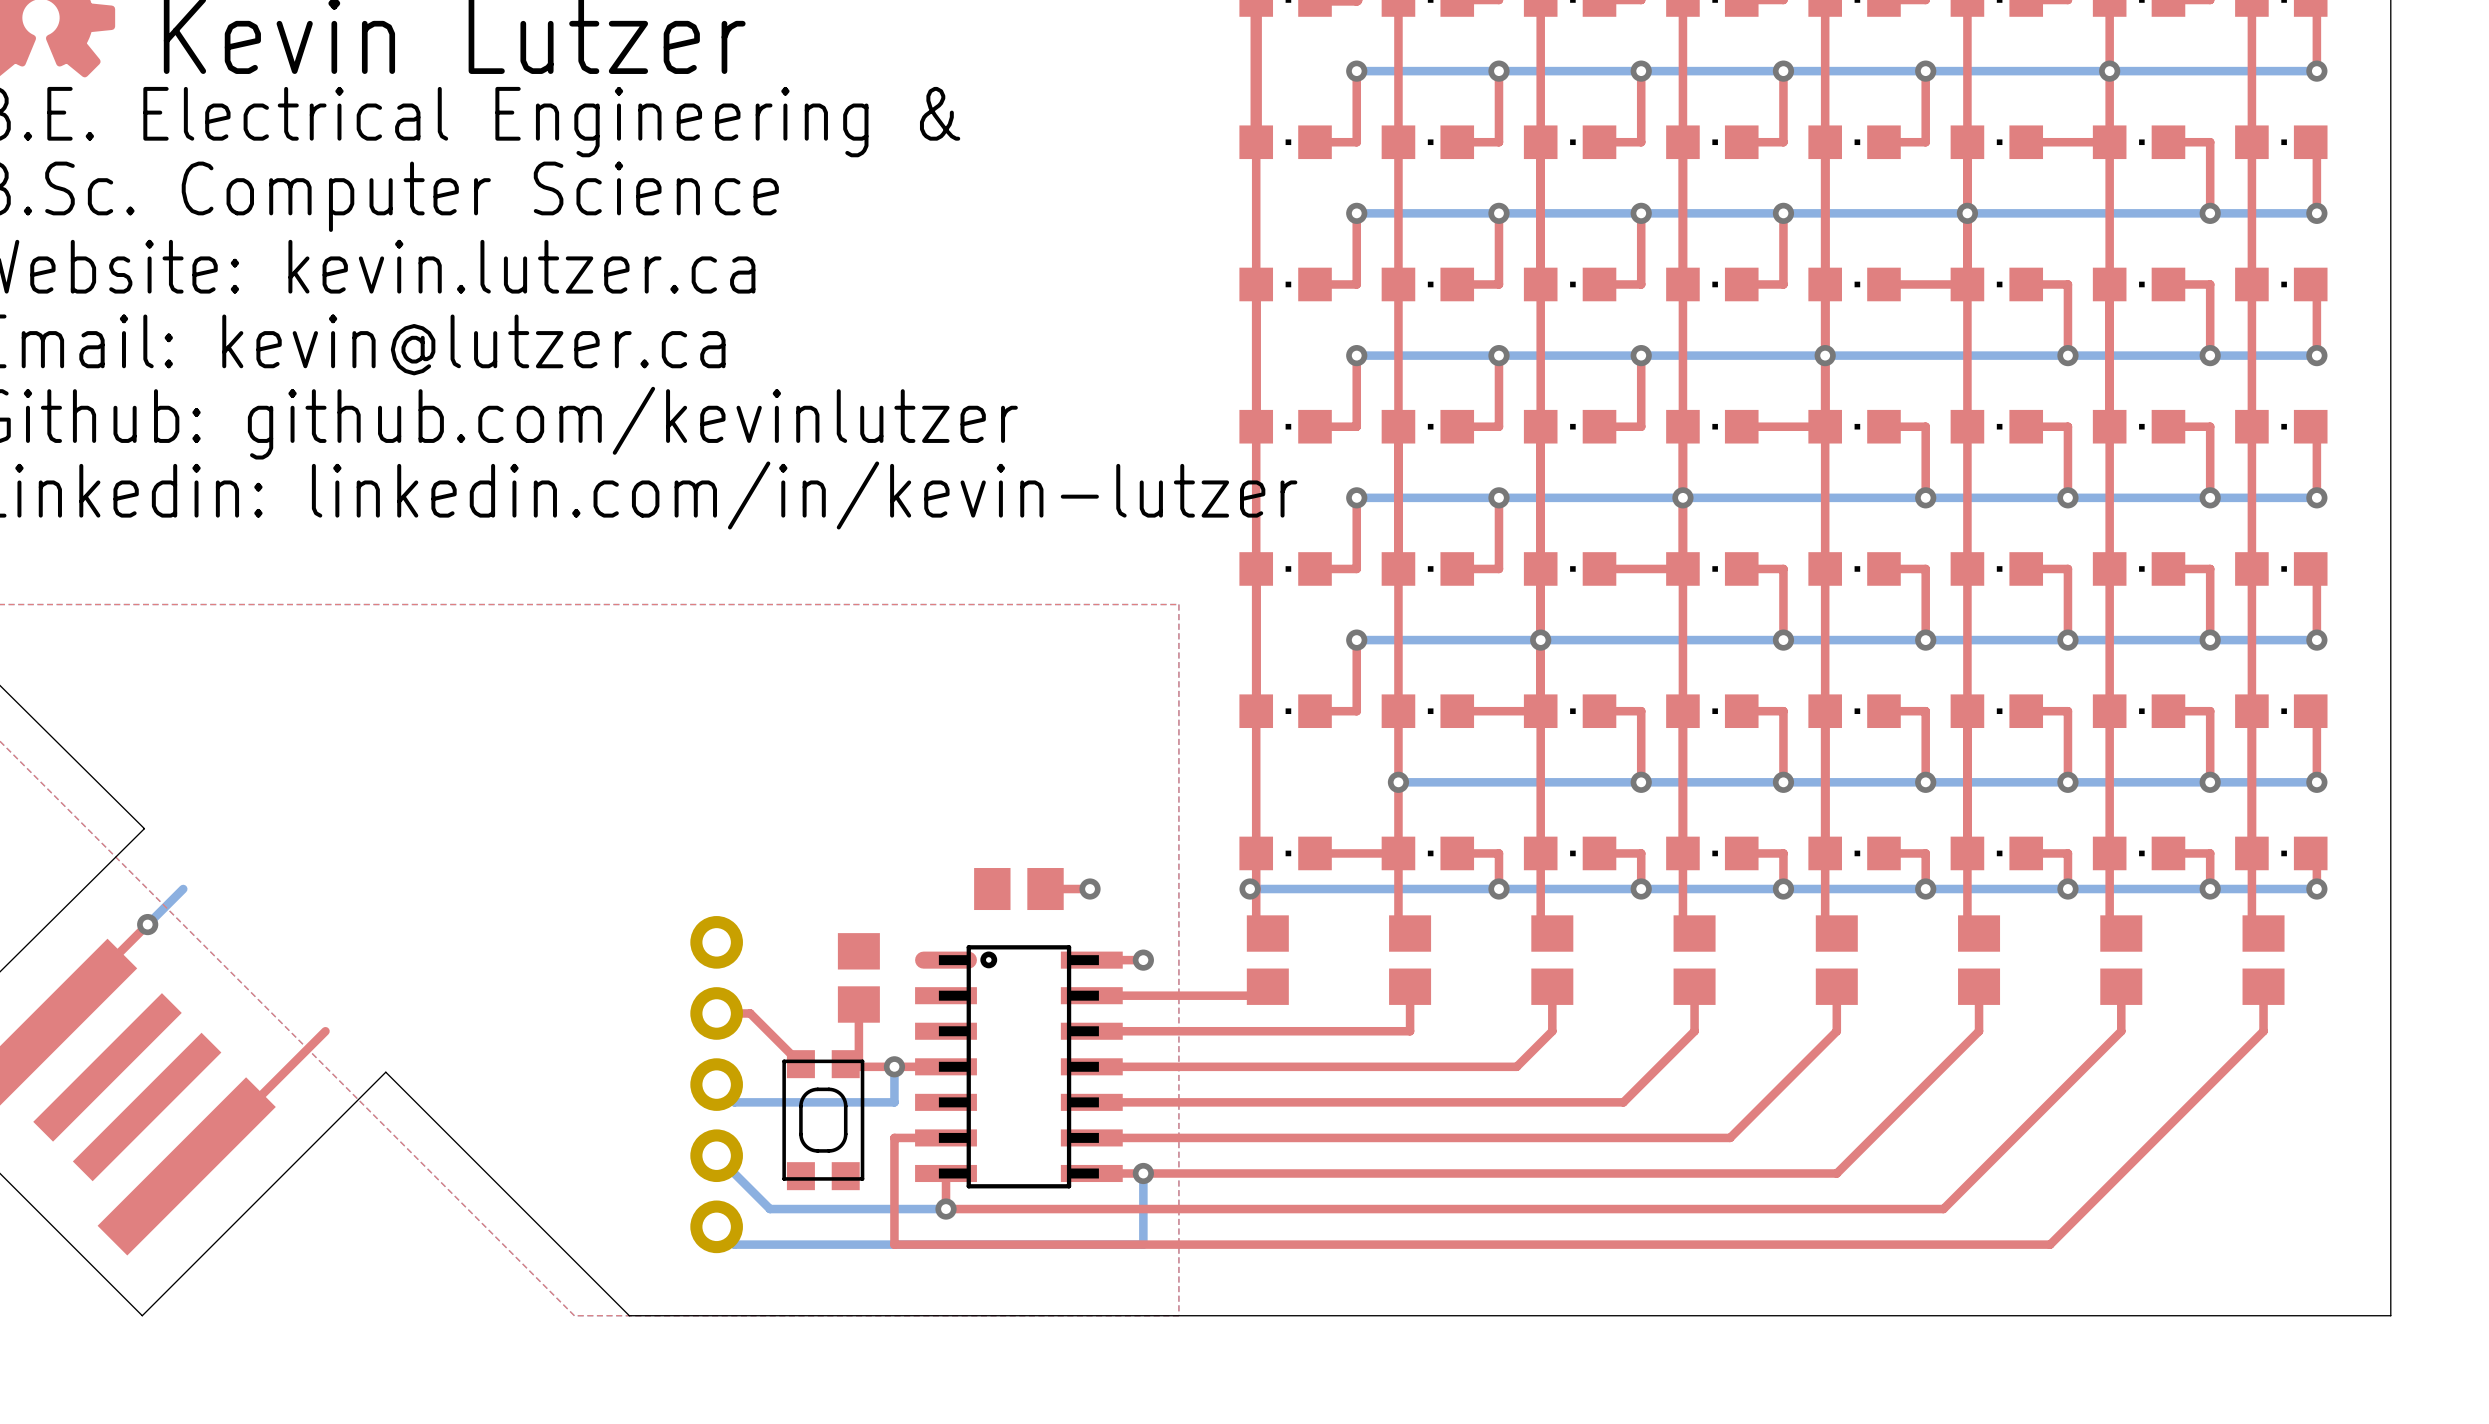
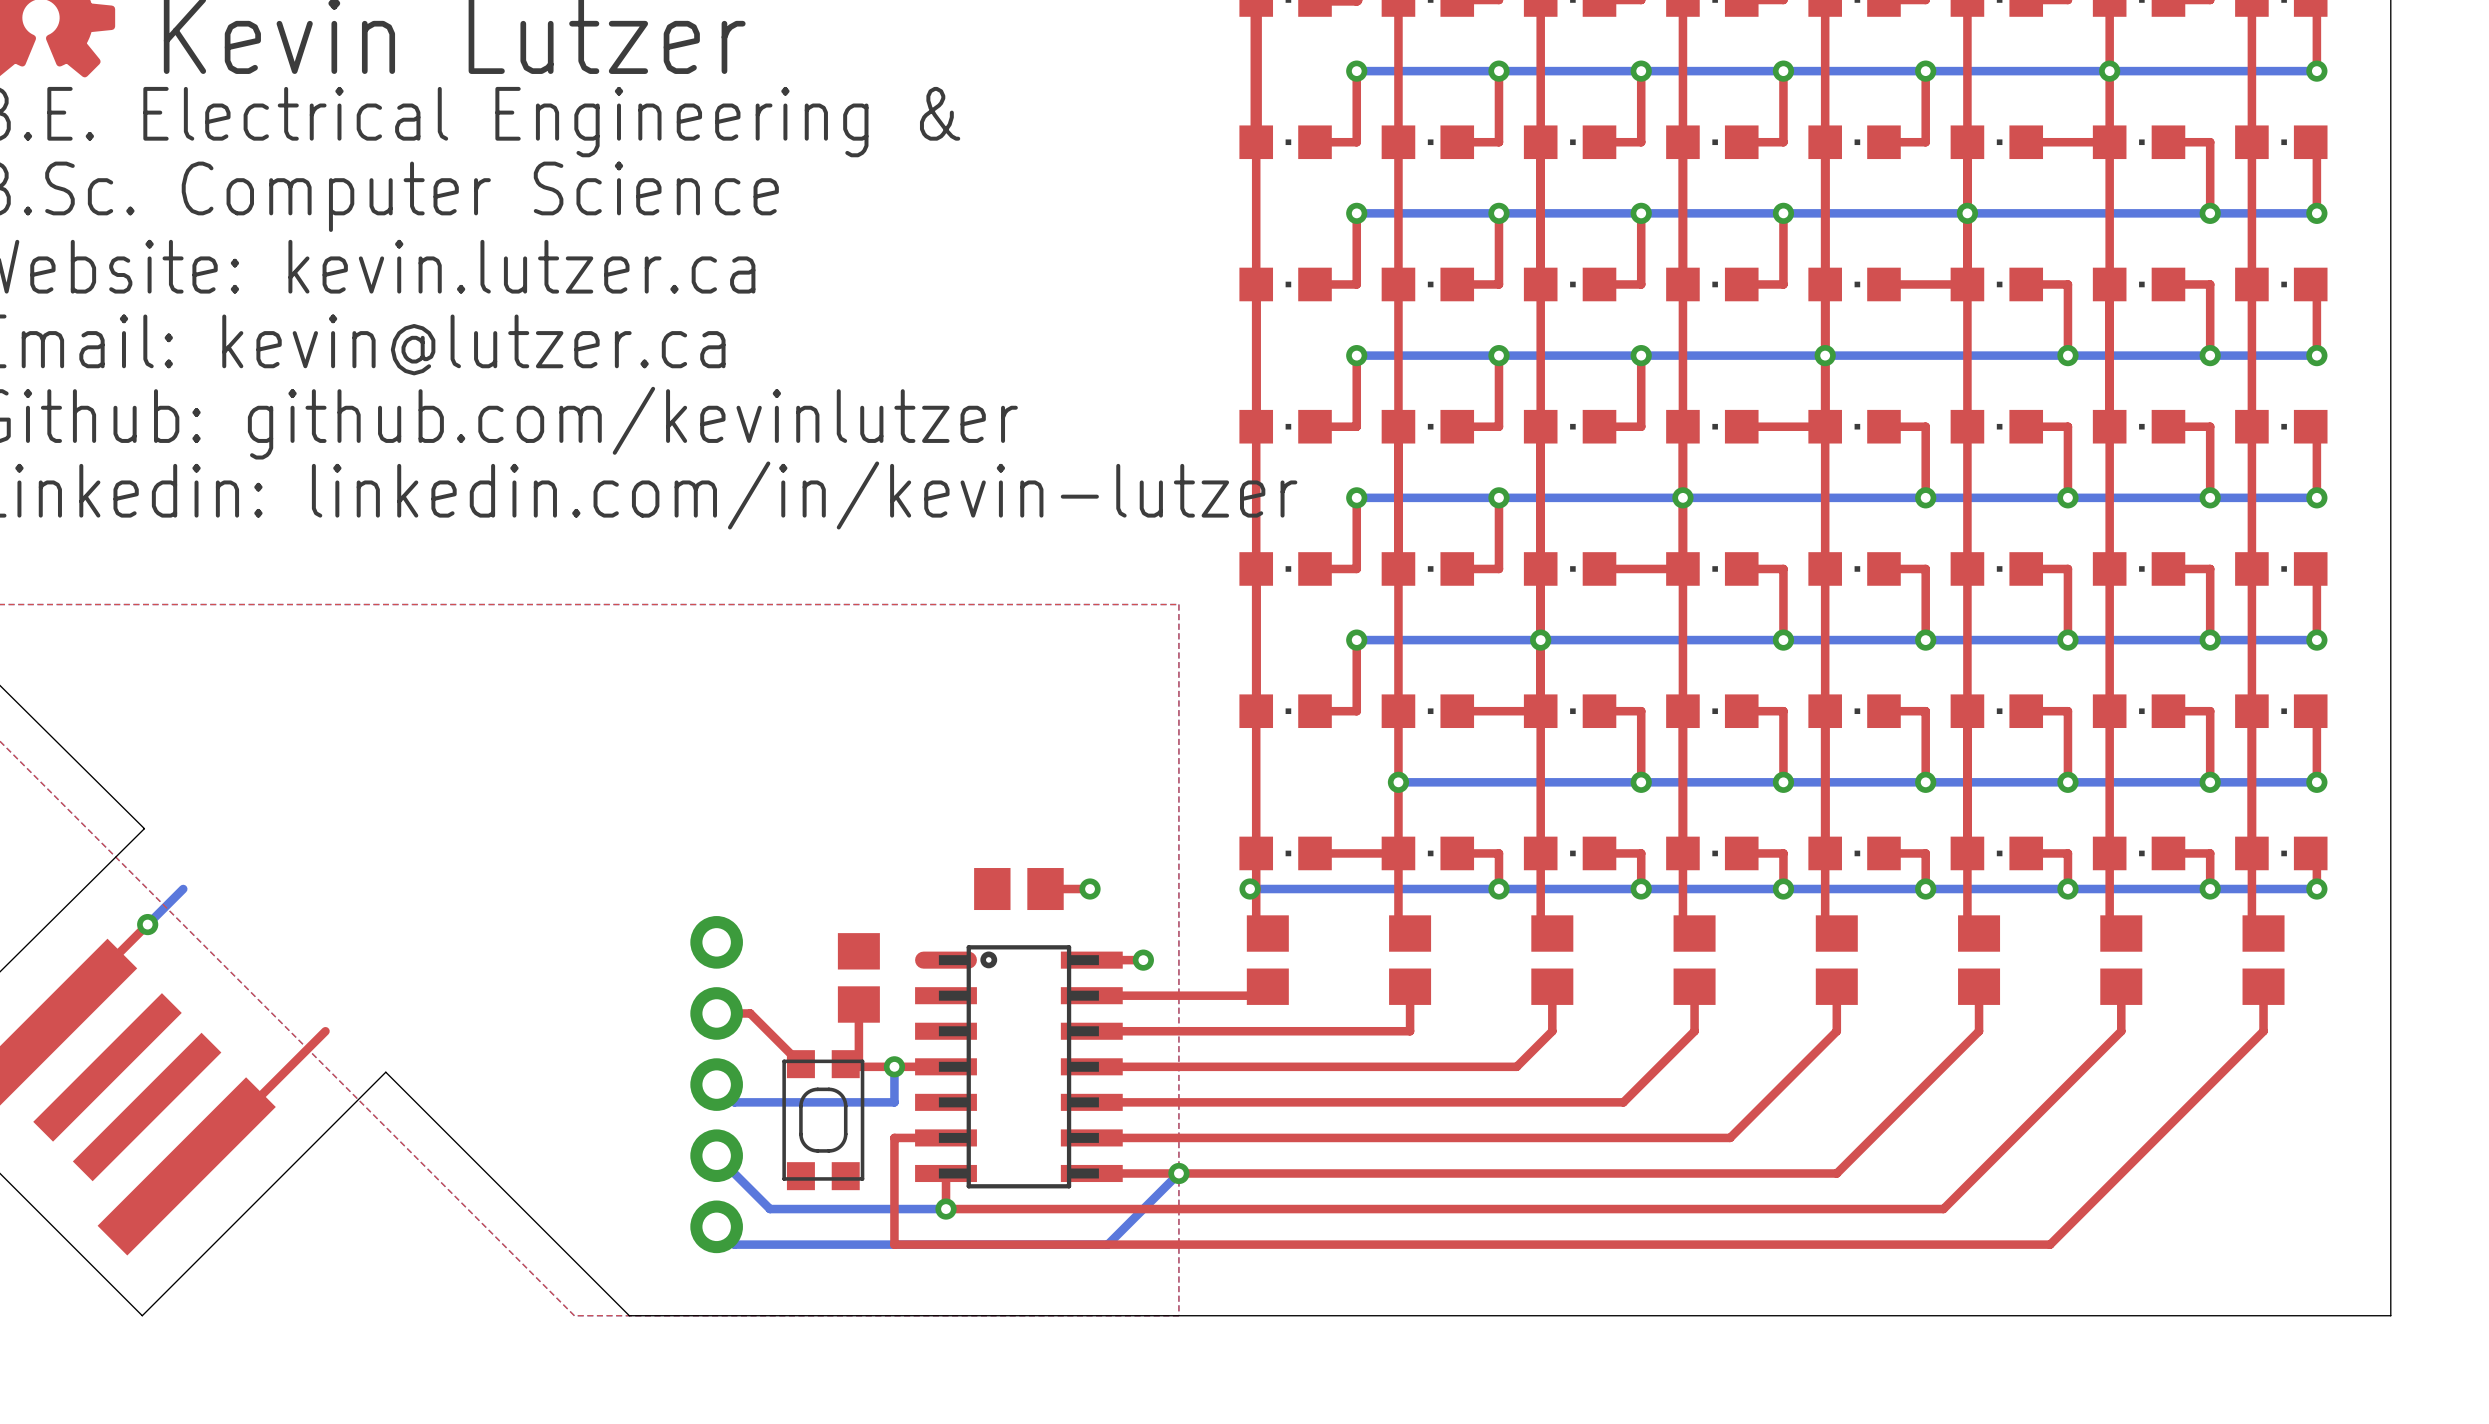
bottom track: (1143, 1173) (1143, 1244) (1107, 1244) -> (1178, 1173) (1107, 1244)
via position: (1143, 1173) -> (1178, 1173)

